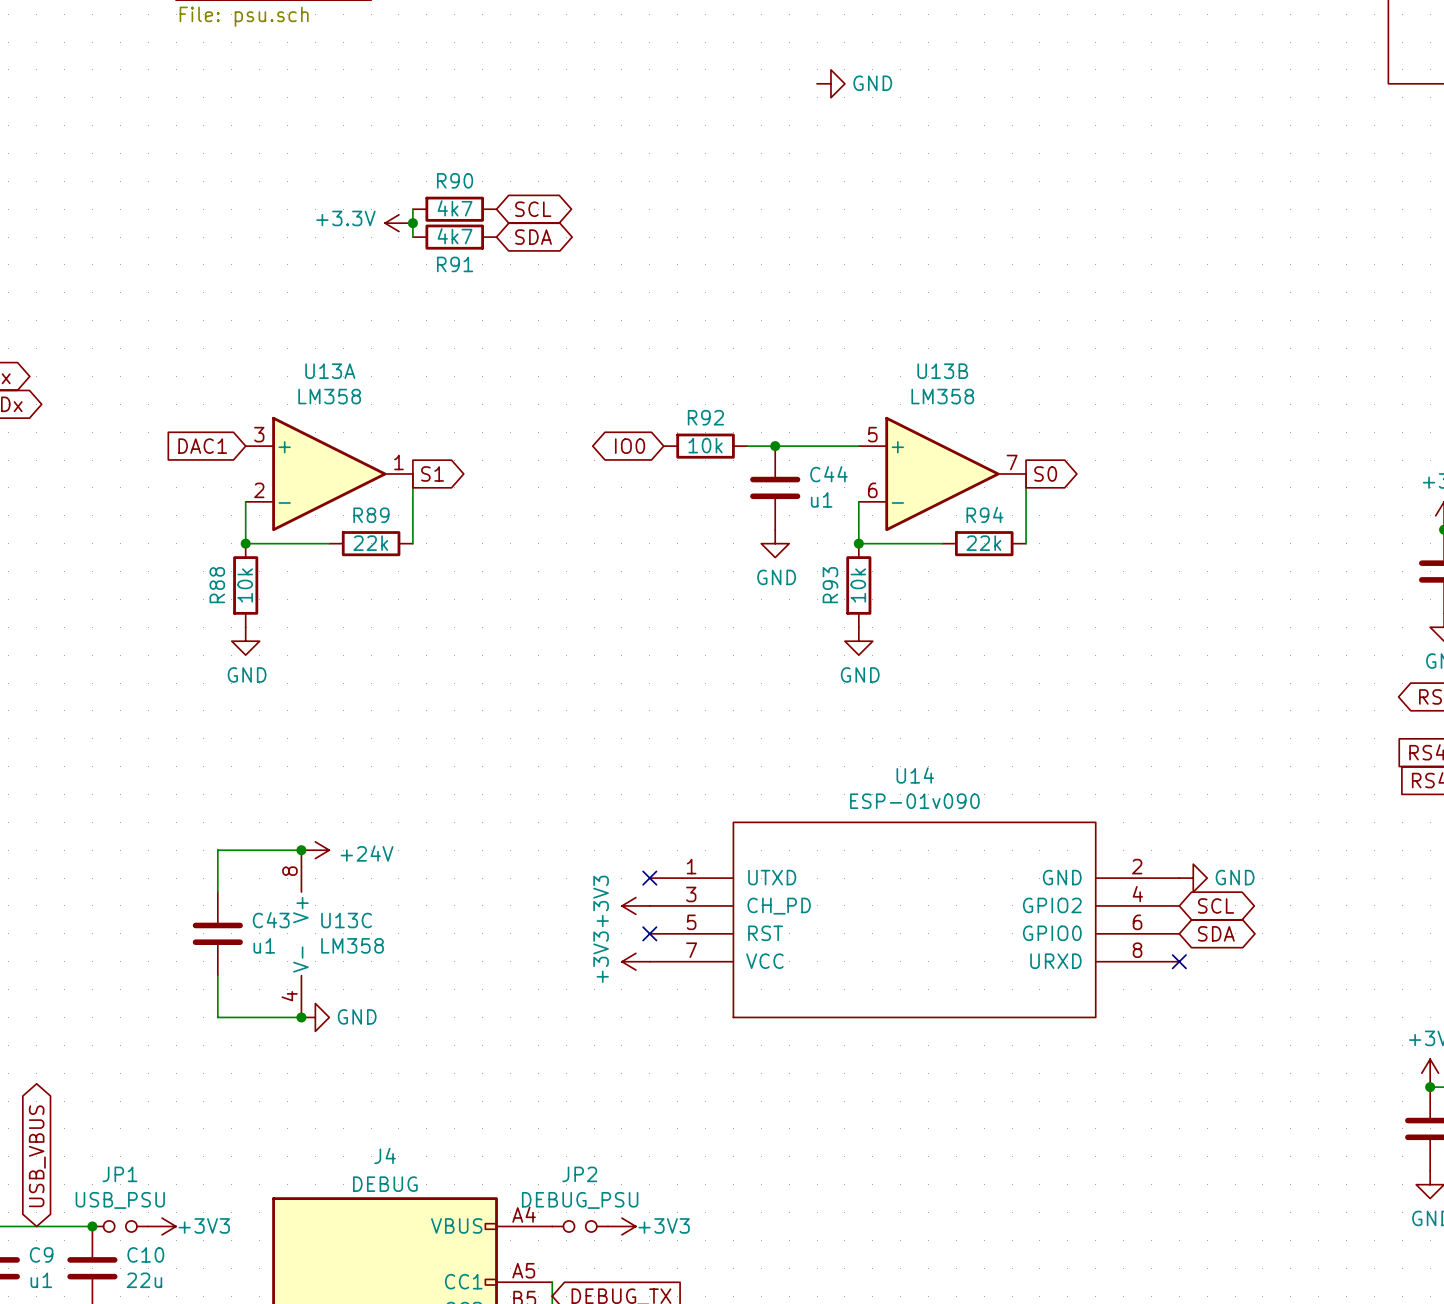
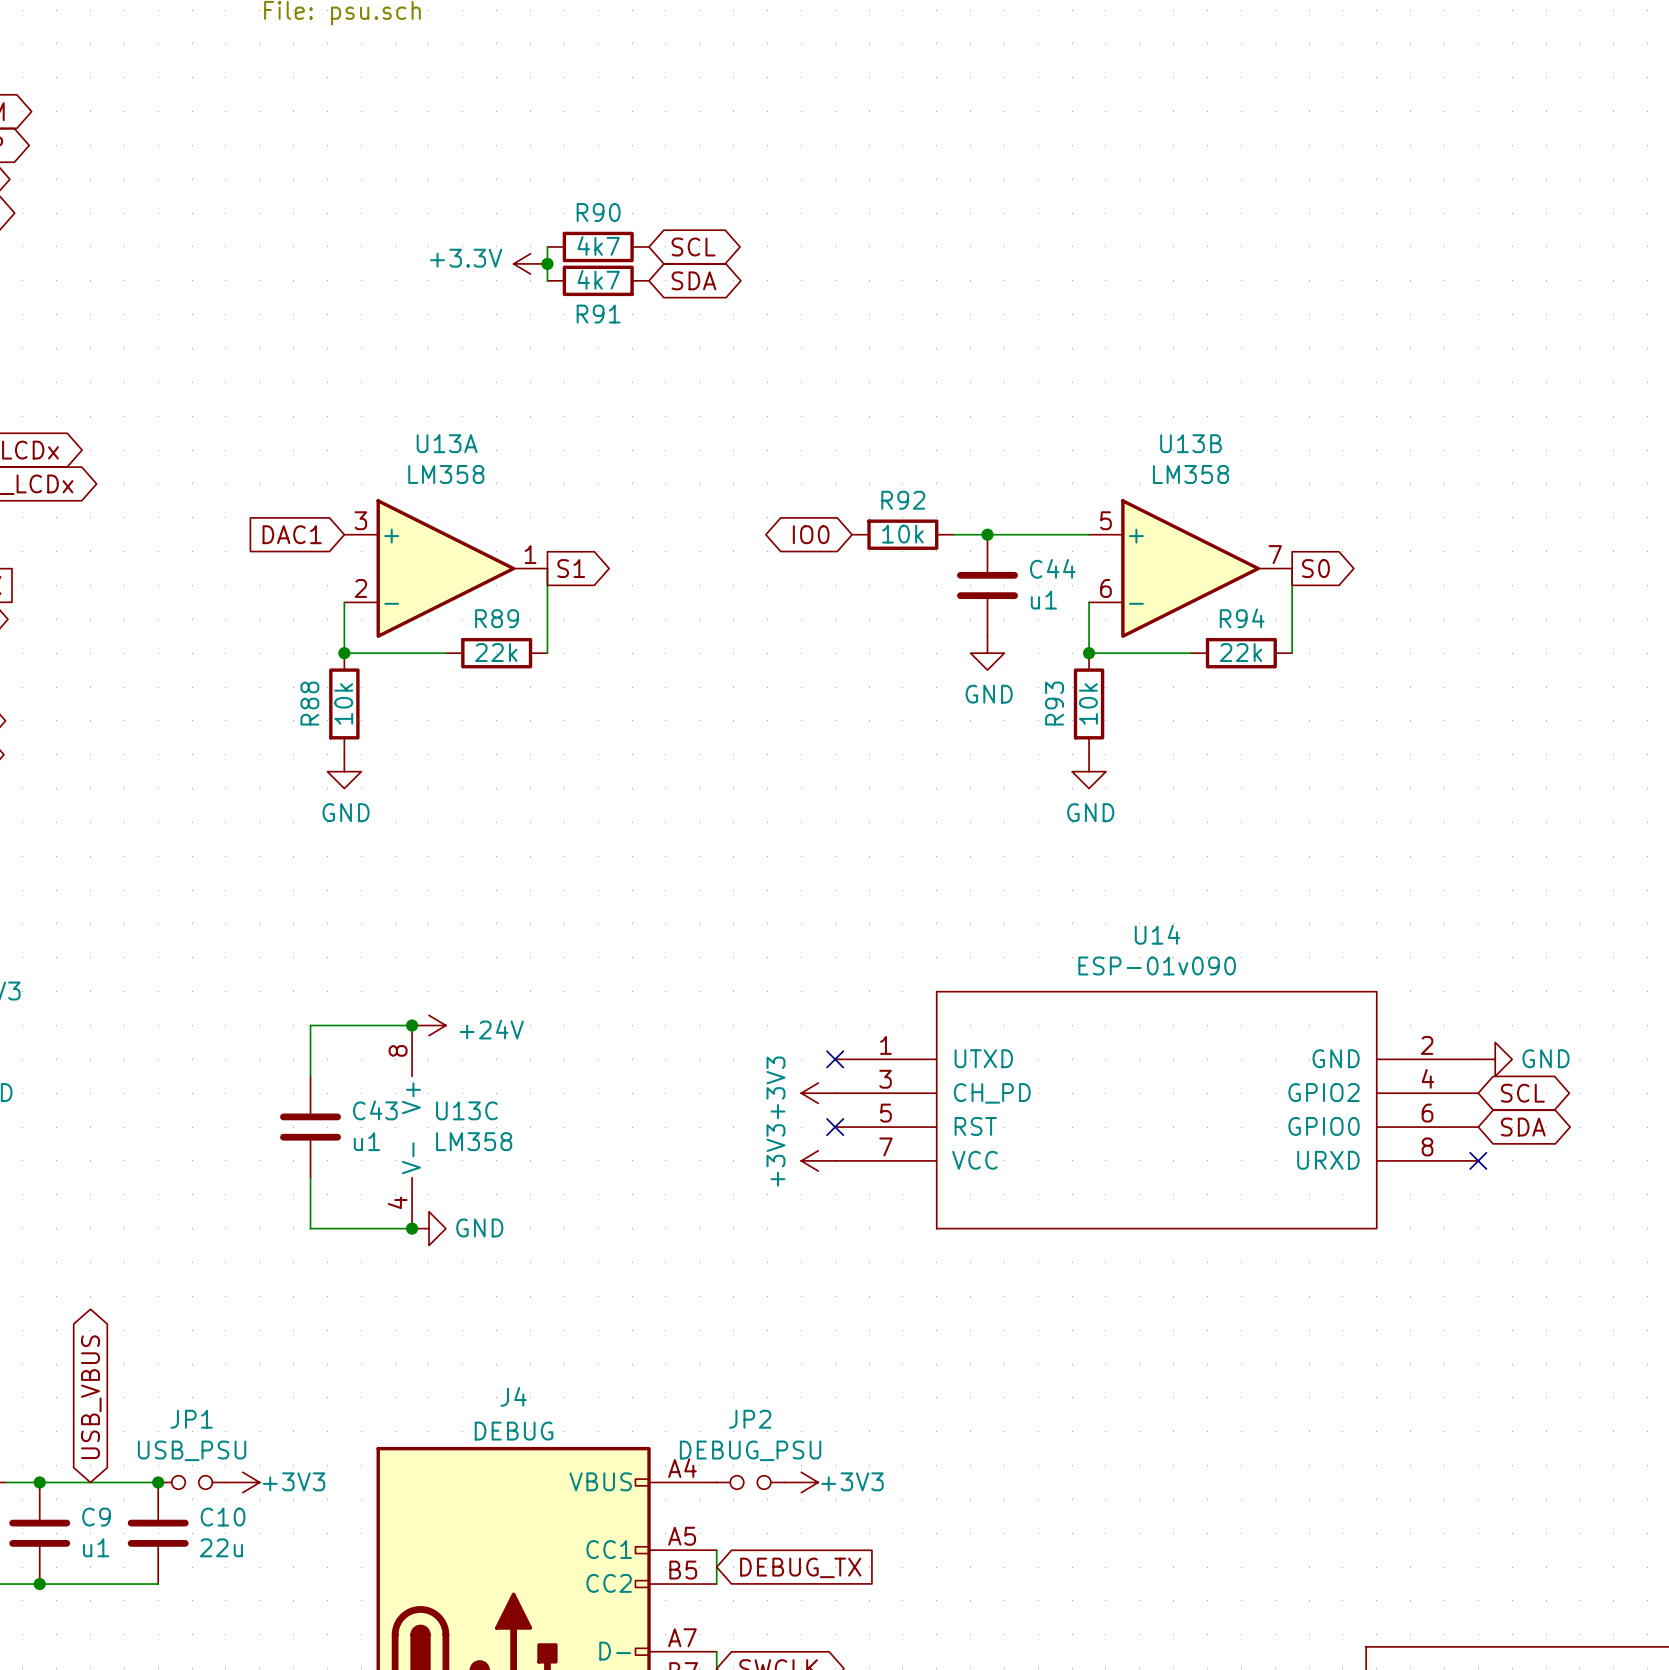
power symbol: GND (830, 83) -> none

